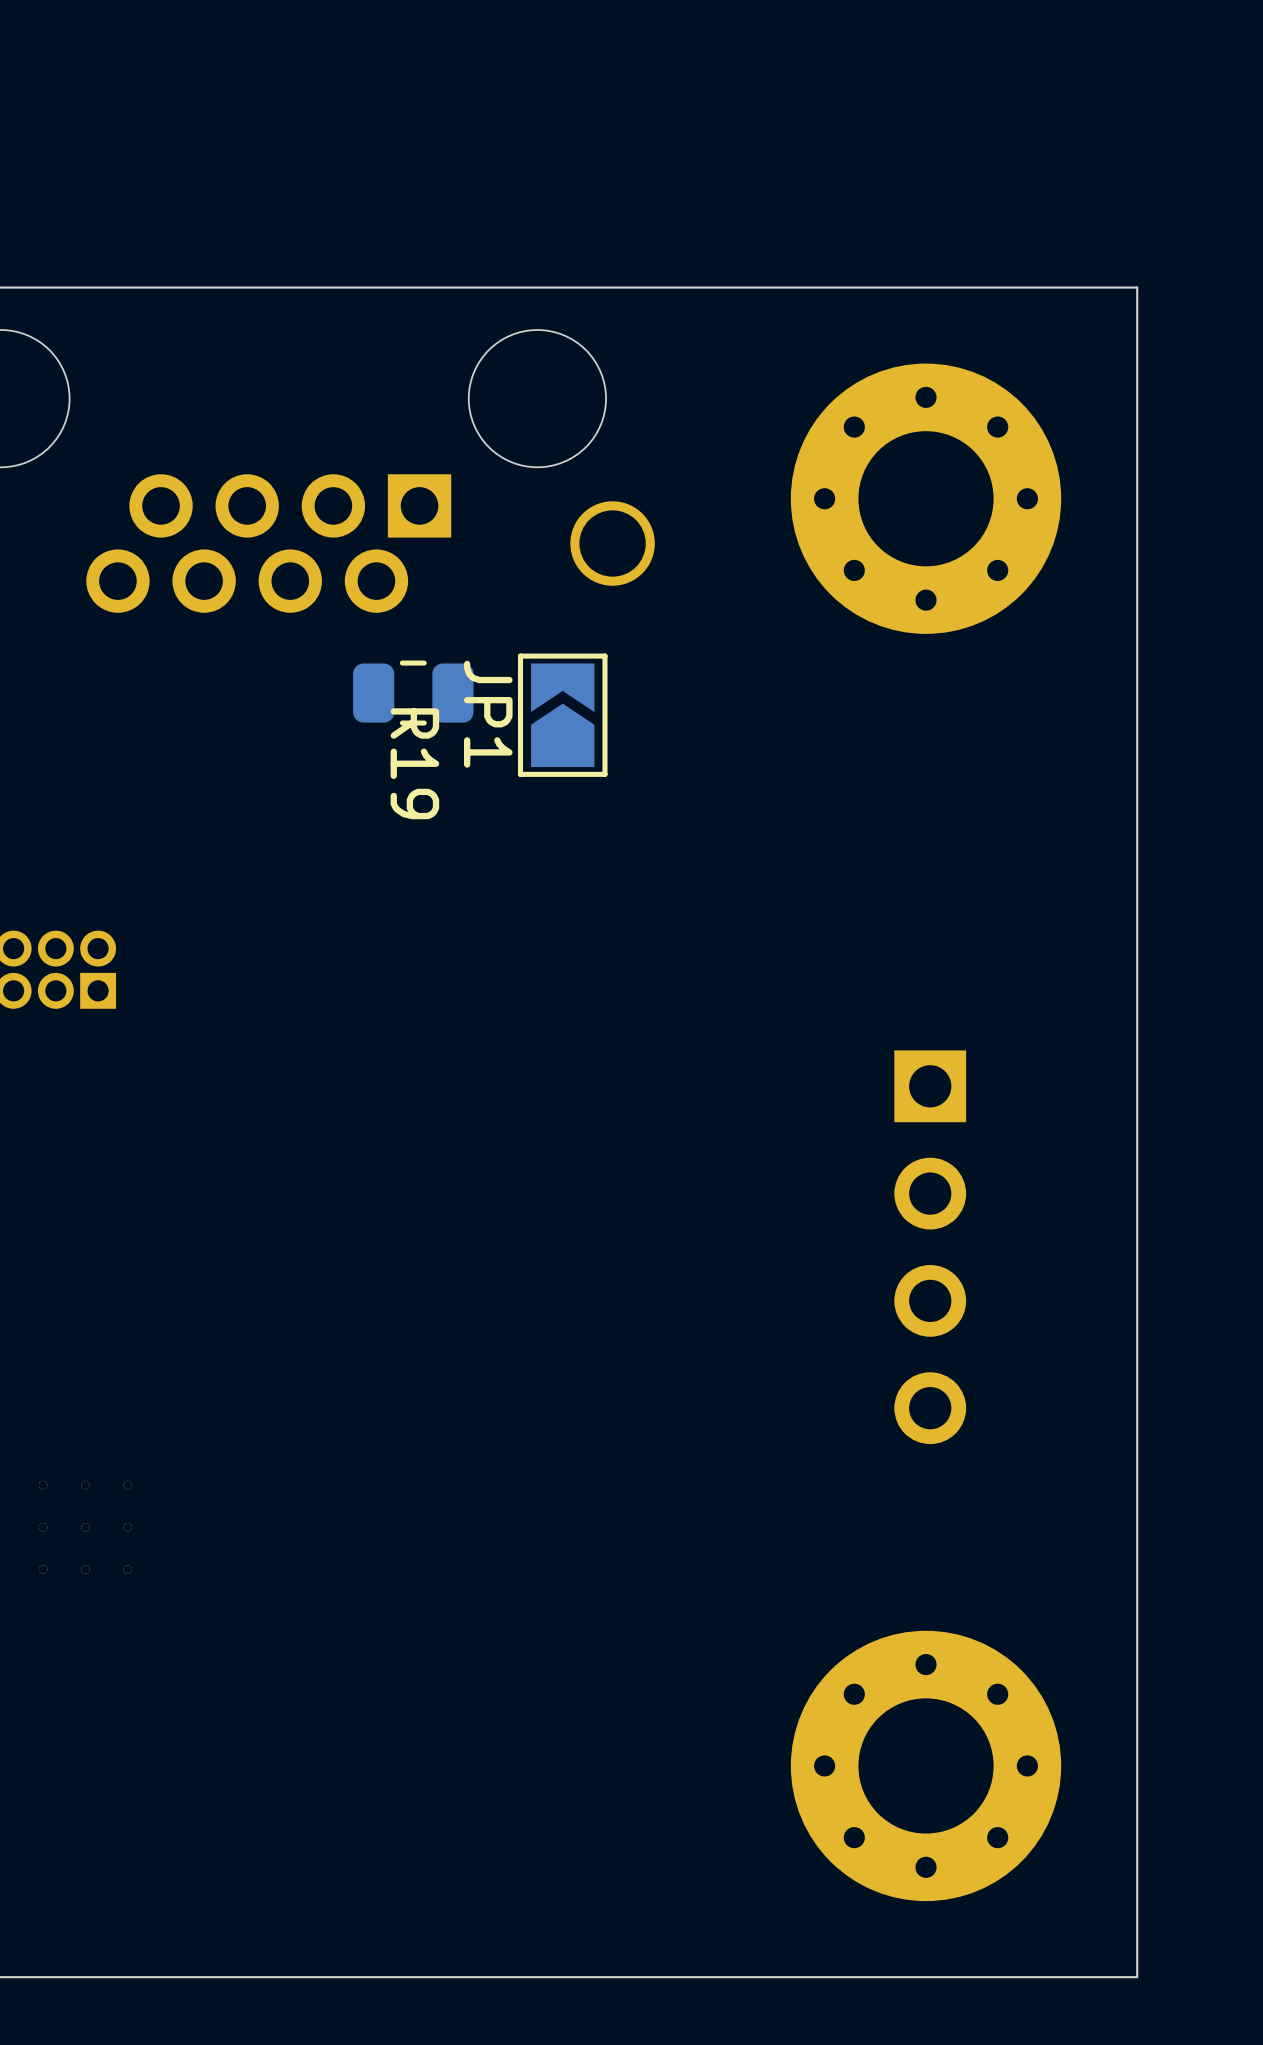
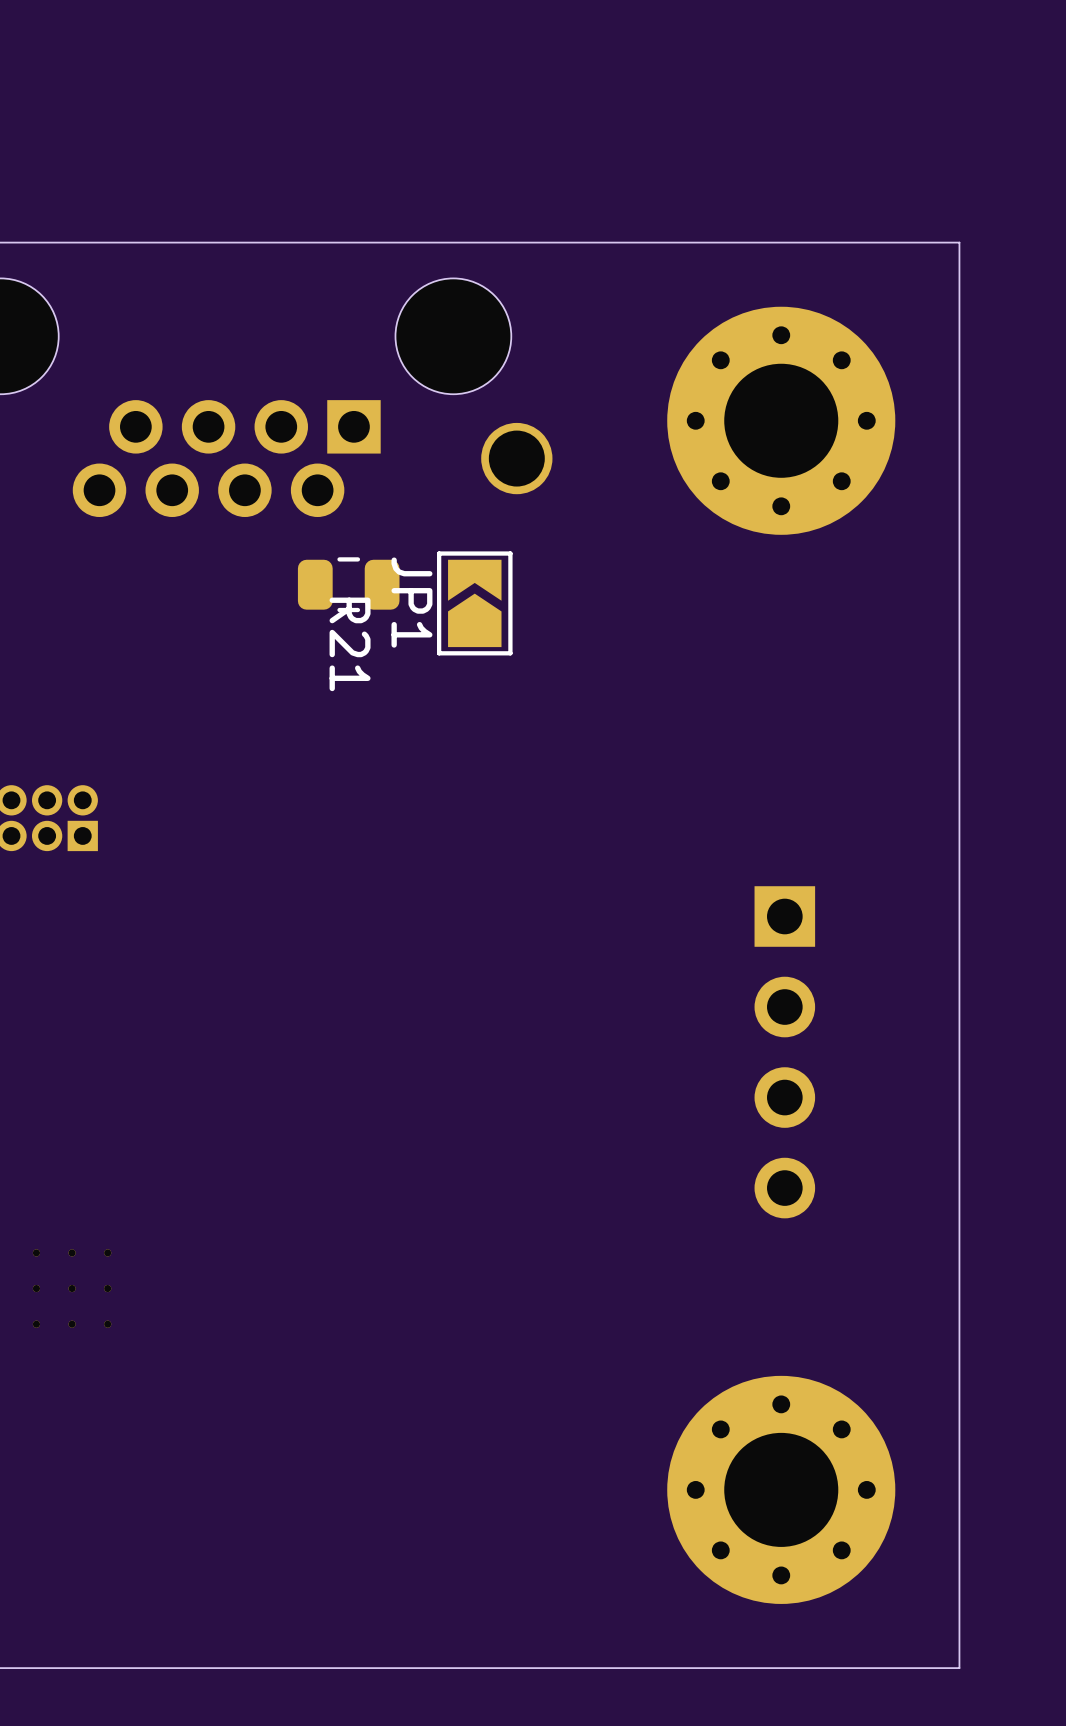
R19 name: R19 (414, 763) -> R21 (350, 644)

